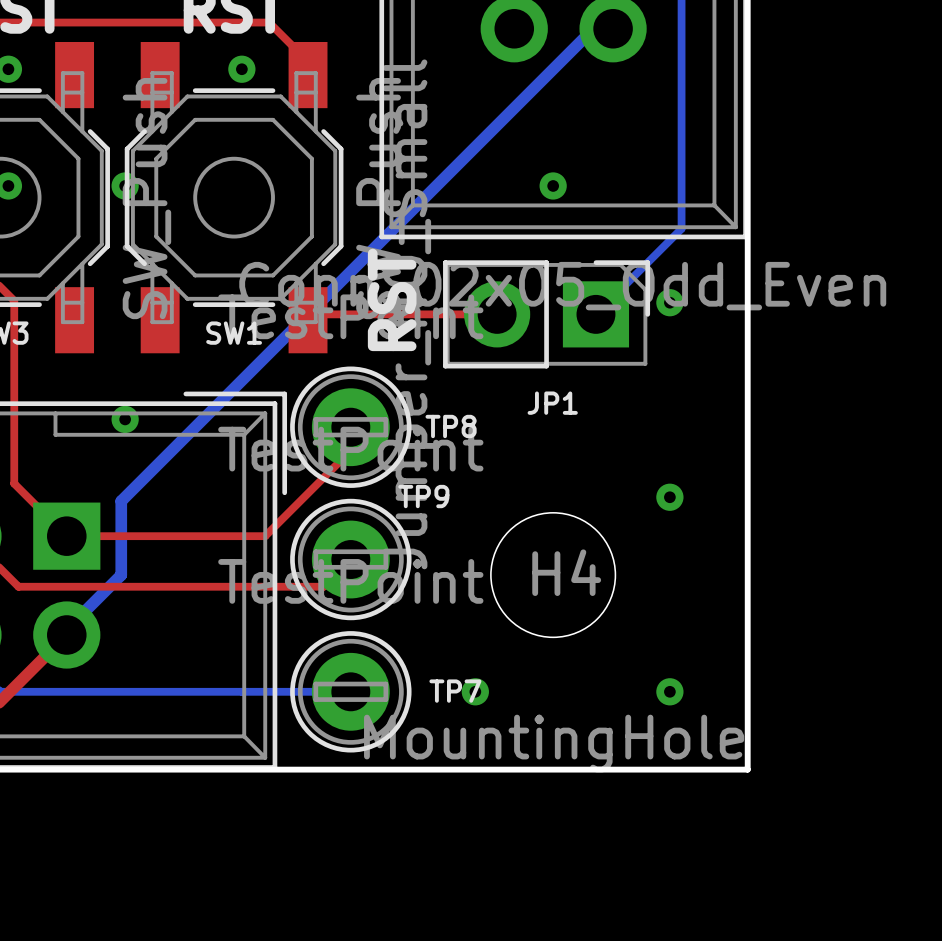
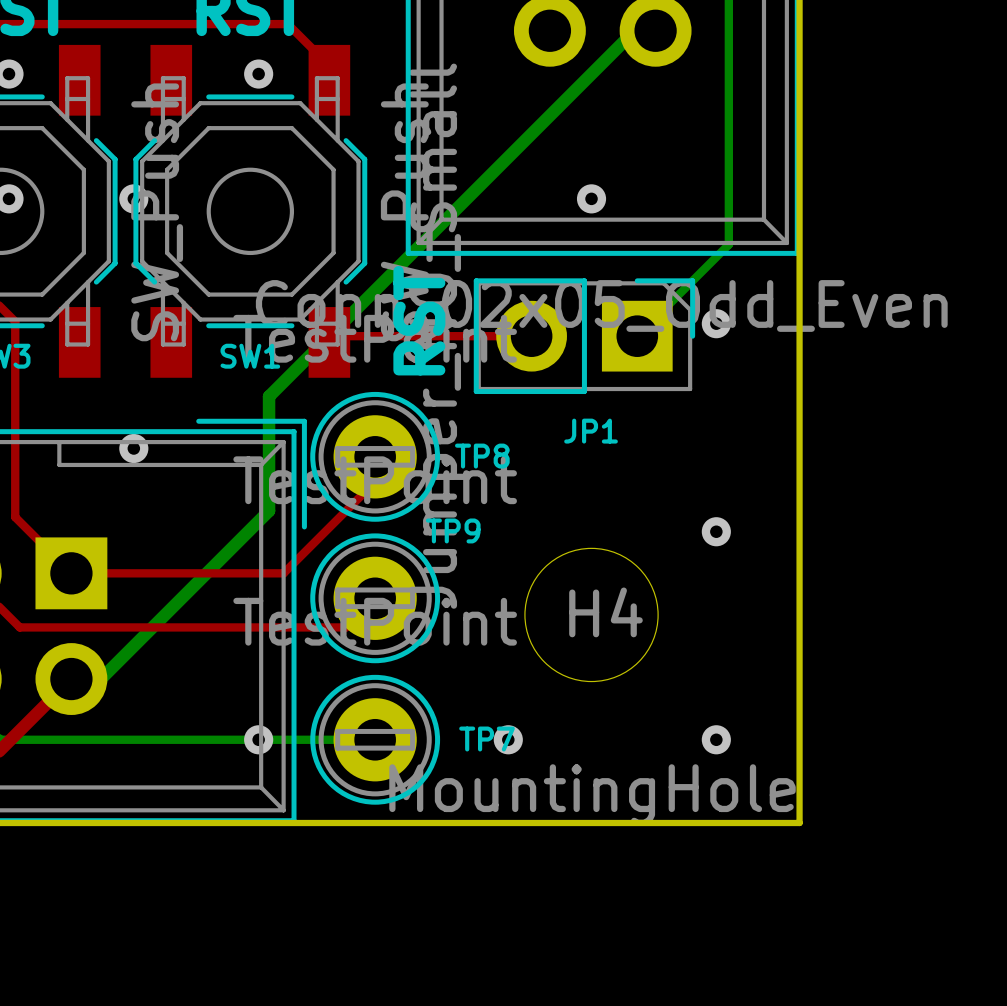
bottom track: (251, 370) (121, 501) (121, 575) (66, 629) (66, 634) -> (269, 396) (269, 510) (100, 679) (71, 679)
via: none -> (258, 739)

